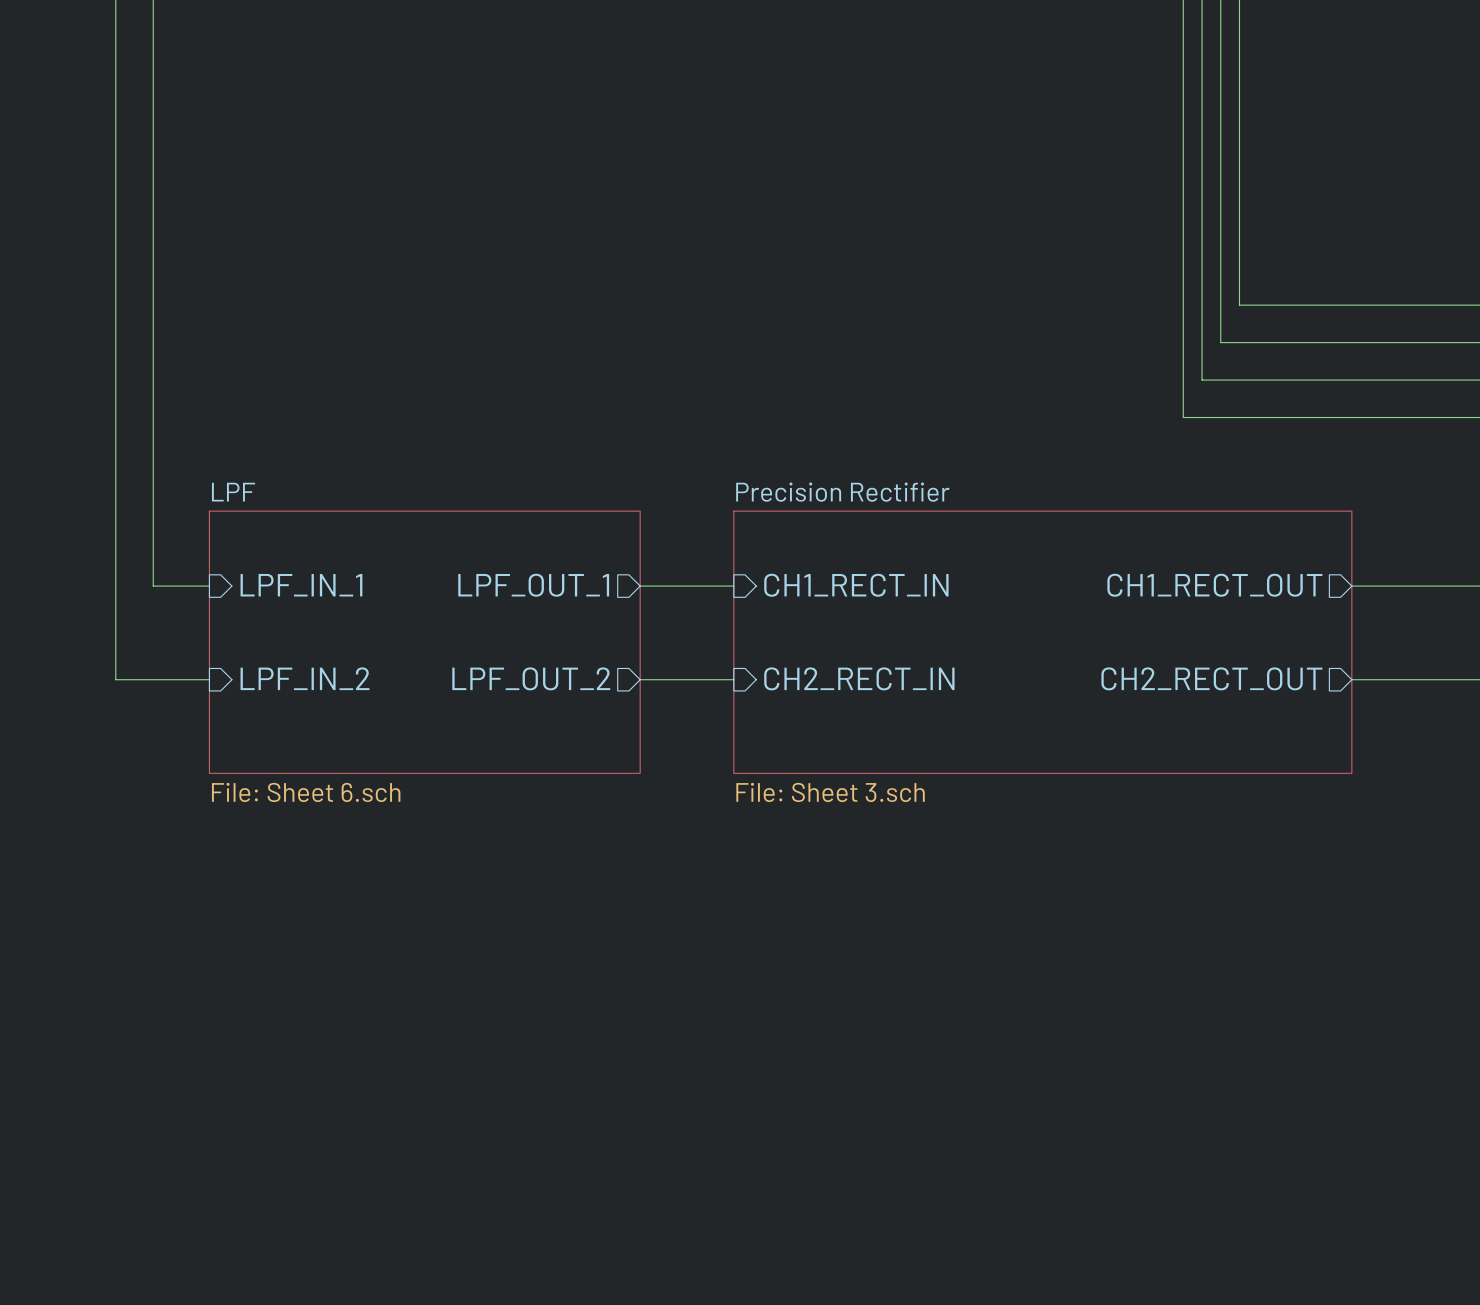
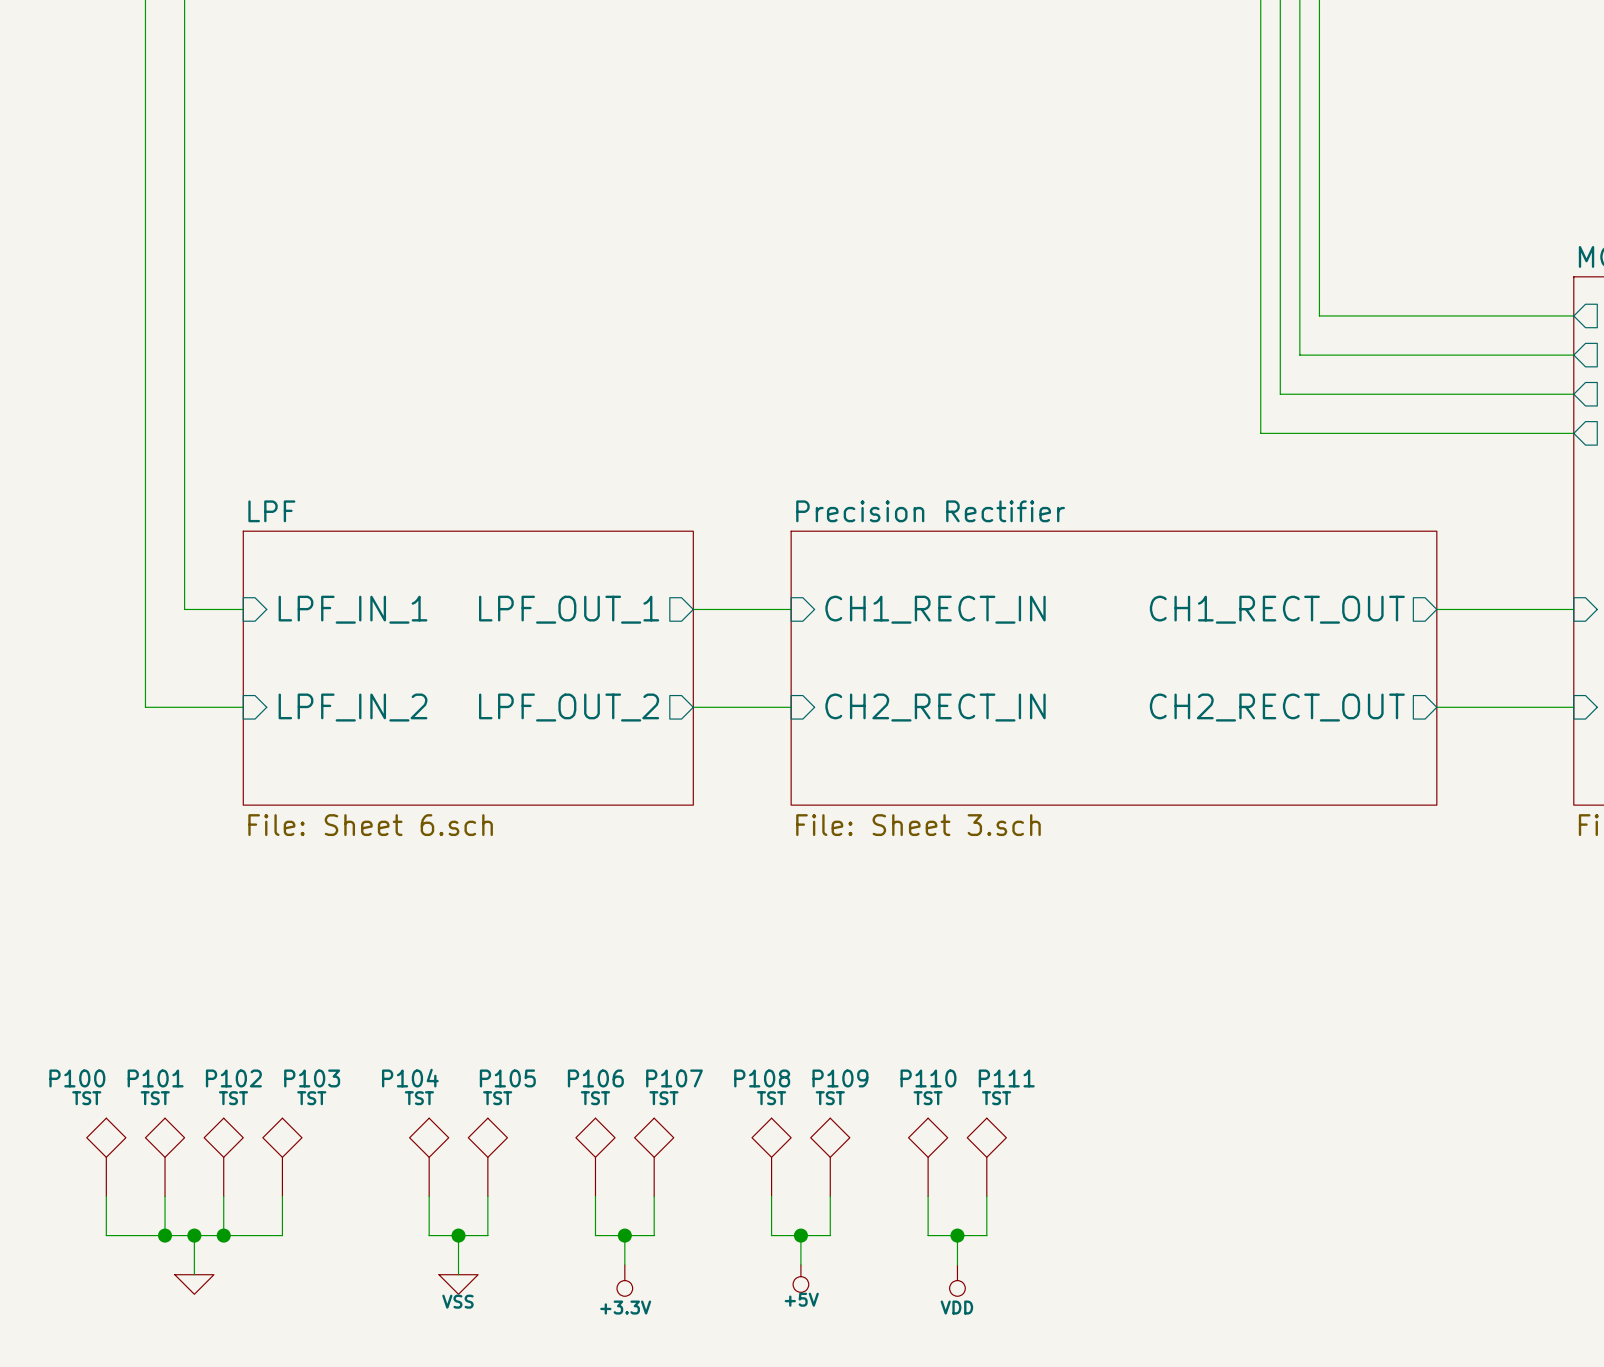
P100: none -> TST (106, 1157)
P101: none -> TST (165, 1157)
P102: none -> TST (223, 1157)
P103: none -> TST (282, 1157)
P104: none -> TST (429, 1157)
P105: none -> TST (487, 1157)
P106: none -> TST (595, 1157)
P107: none -> TST (654, 1157)
P108: none -> TST (771, 1157)
P109: none -> TST (830, 1157)
P110: none -> TST (928, 1157)
P111: none -> TST (986, 1157)
wire: none -> (106, 1196) (106, 1235) (282, 1235) (282, 1196)
wire: none -> (165, 1196) (165, 1235)
wire: none -> (223, 1196) (223, 1235)
wire: none -> (429, 1196) (429, 1235) (487, 1235) (487, 1196)
wire: none -> (595, 1196) (595, 1235) (654, 1235) (654, 1196)
wire: none -> (771, 1196) (771, 1235) (830, 1235) (830, 1196)
wire: none -> (928, 1196) (928, 1235) (986, 1235) (986, 1196)
junction: none -> (165, 1235)
wire: none -> (194, 1235) (194, 1274)
junction: none -> (194, 1235)
junction: none -> (223, 1235)
wire: none -> (458, 1235) (458, 1274)
junction: none -> (458, 1235)
wire: none -> (624, 1235) (624, 1264)
junction: none -> (624, 1235)
wire: none -> (800, 1235) (800, 1264)
junction: none -> (800, 1235)
wire: none -> (957, 1235) (957, 1264)
junction: none -> (957, 1235)
power symbol: none -> +5V (800, 1278)
power symbol: none -> +3.3V (624, 1280)
power symbol: none -> VDD (957, 1280)
power symbol: none -> (194, 1284)
power symbol: none -> VSS (458, 1284)

